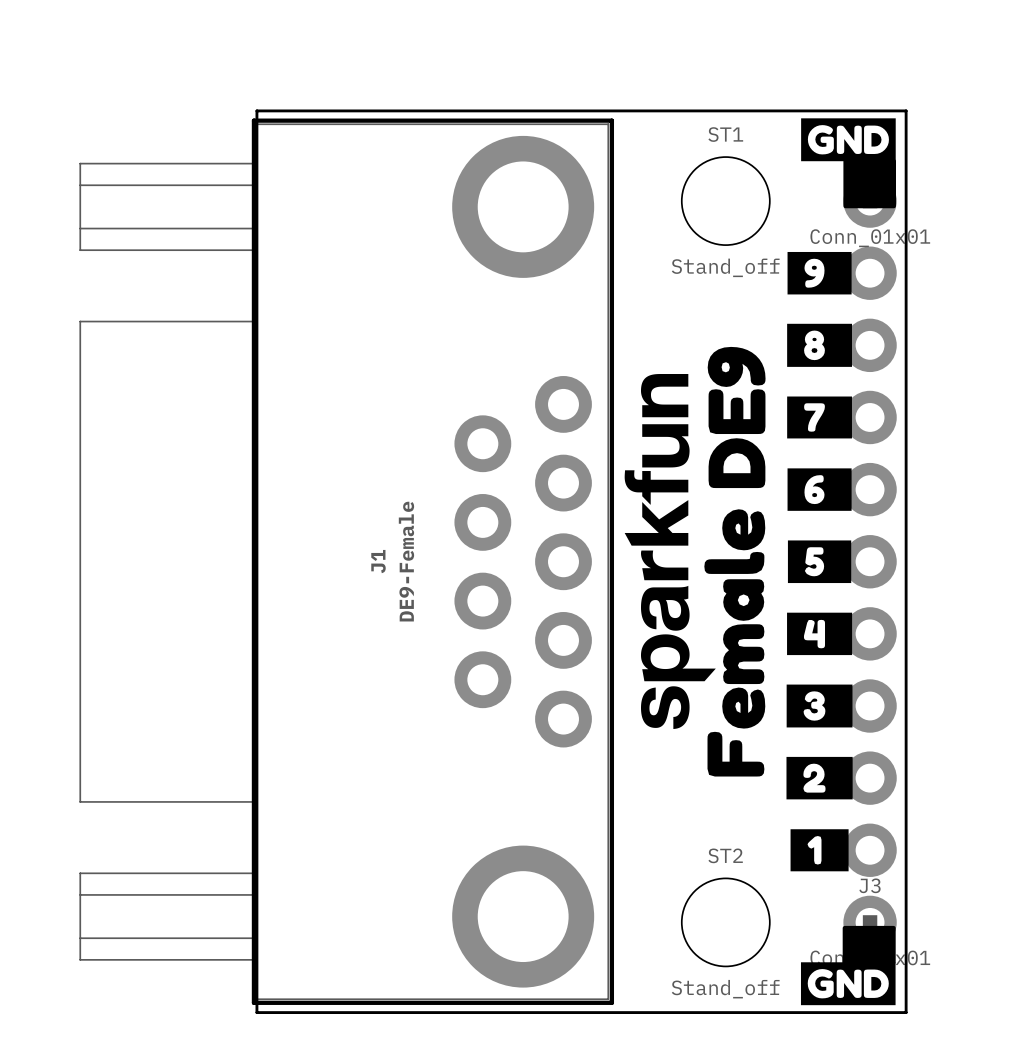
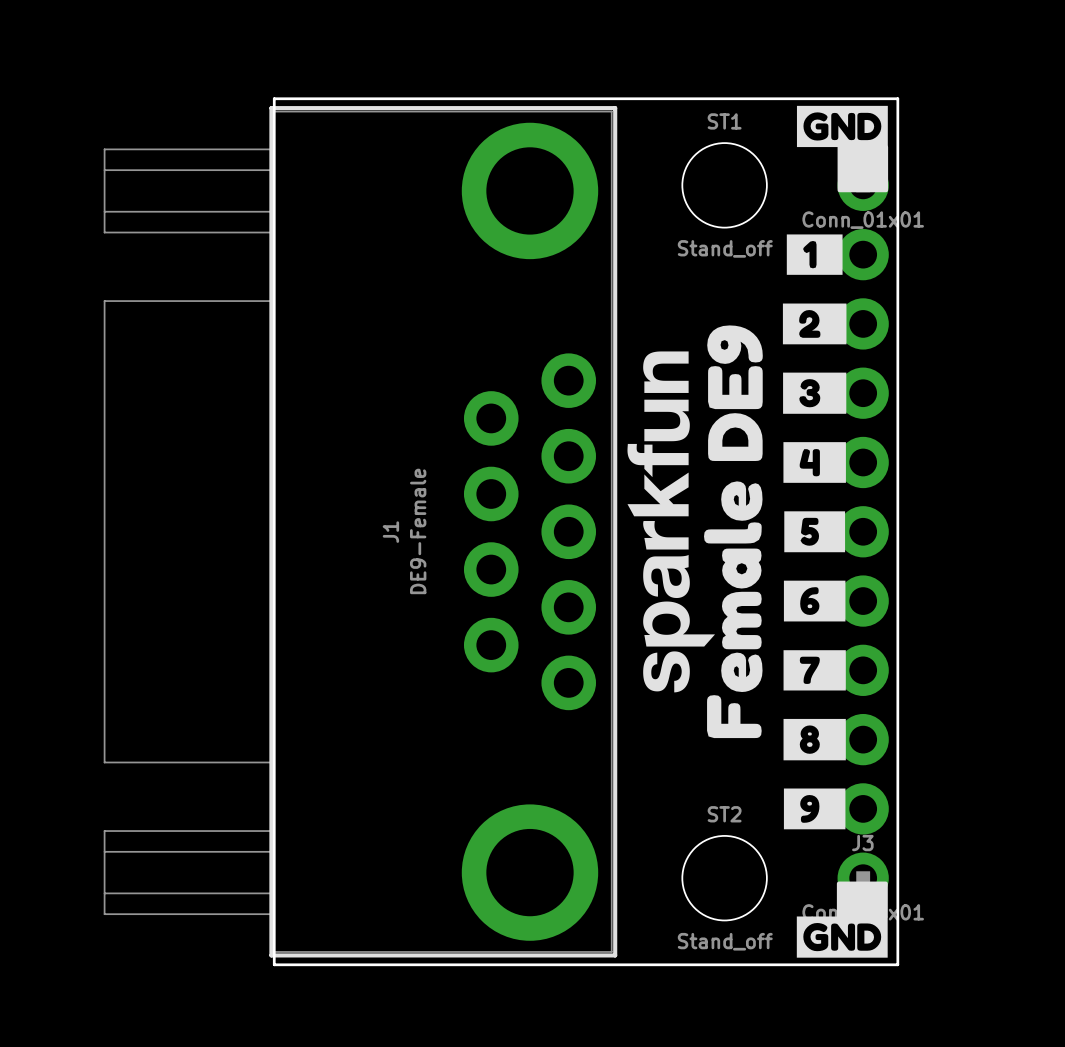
drawing position: (819, 273) -> (814, 808)
drawing position: (819, 345) -> (814, 739)
drawing position: (819, 417) -> (814, 670)
drawing position: (819, 489) -> (814, 601)
drawing position: (819, 633) -> (814, 462)
drawing position: (819, 706) -> (814, 393)
drawing position: (819, 778) -> (814, 323)
drawing position: (819, 850) -> (814, 254)

